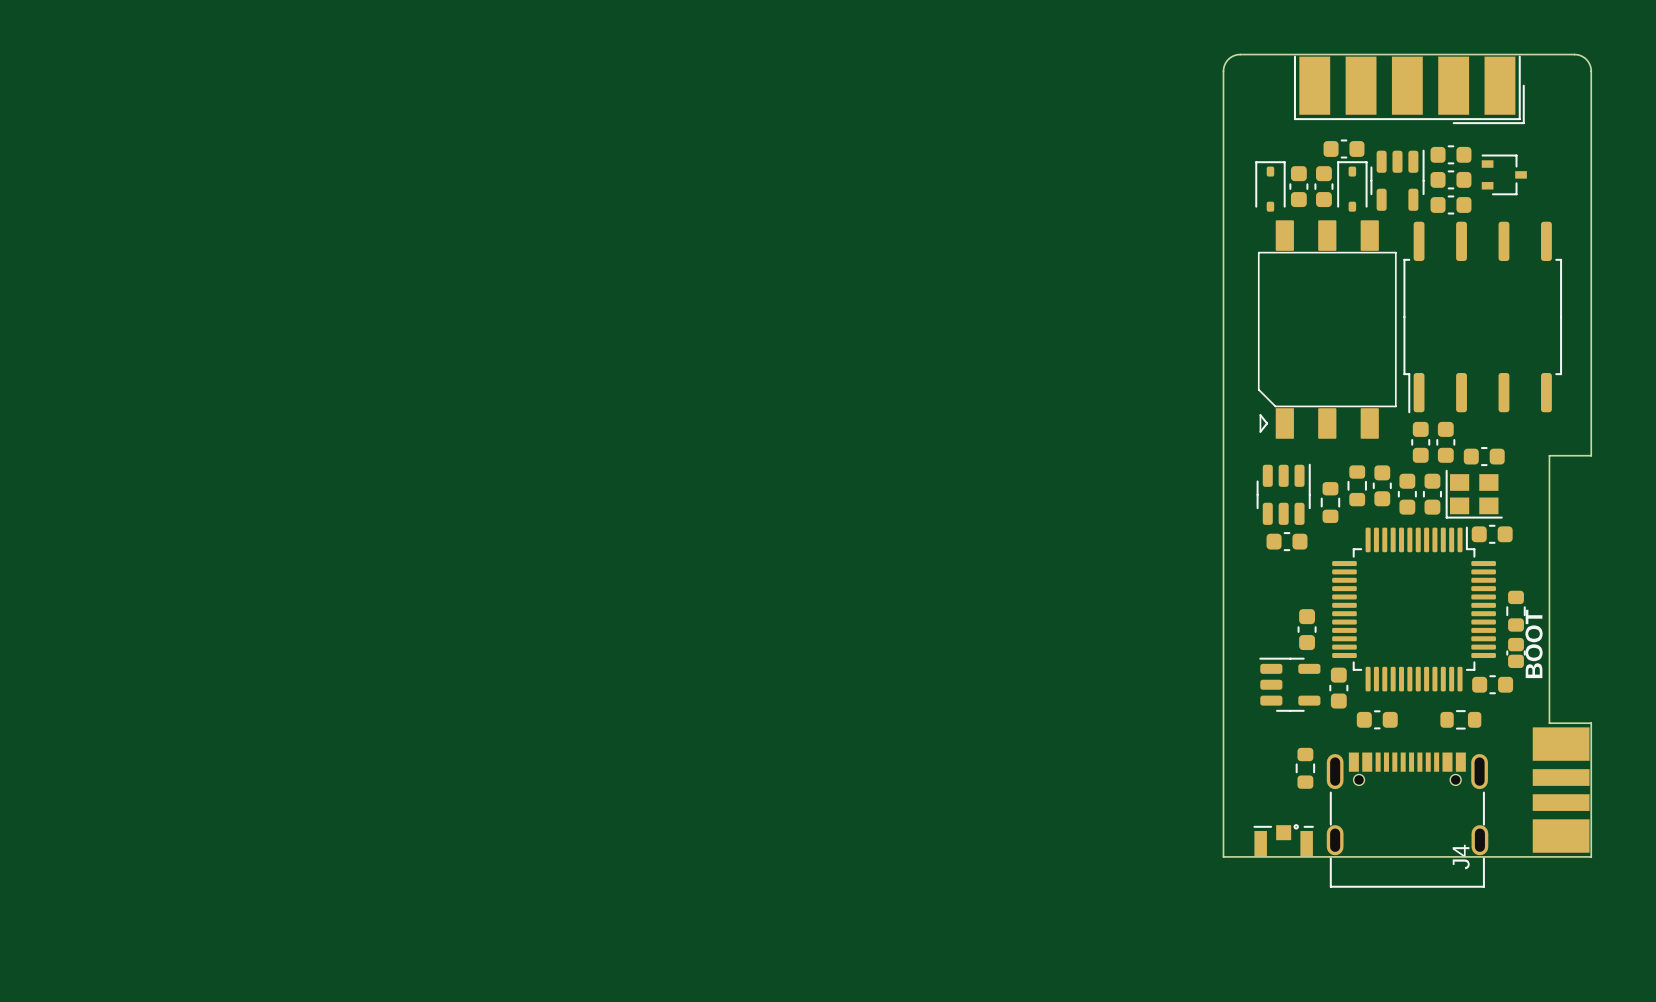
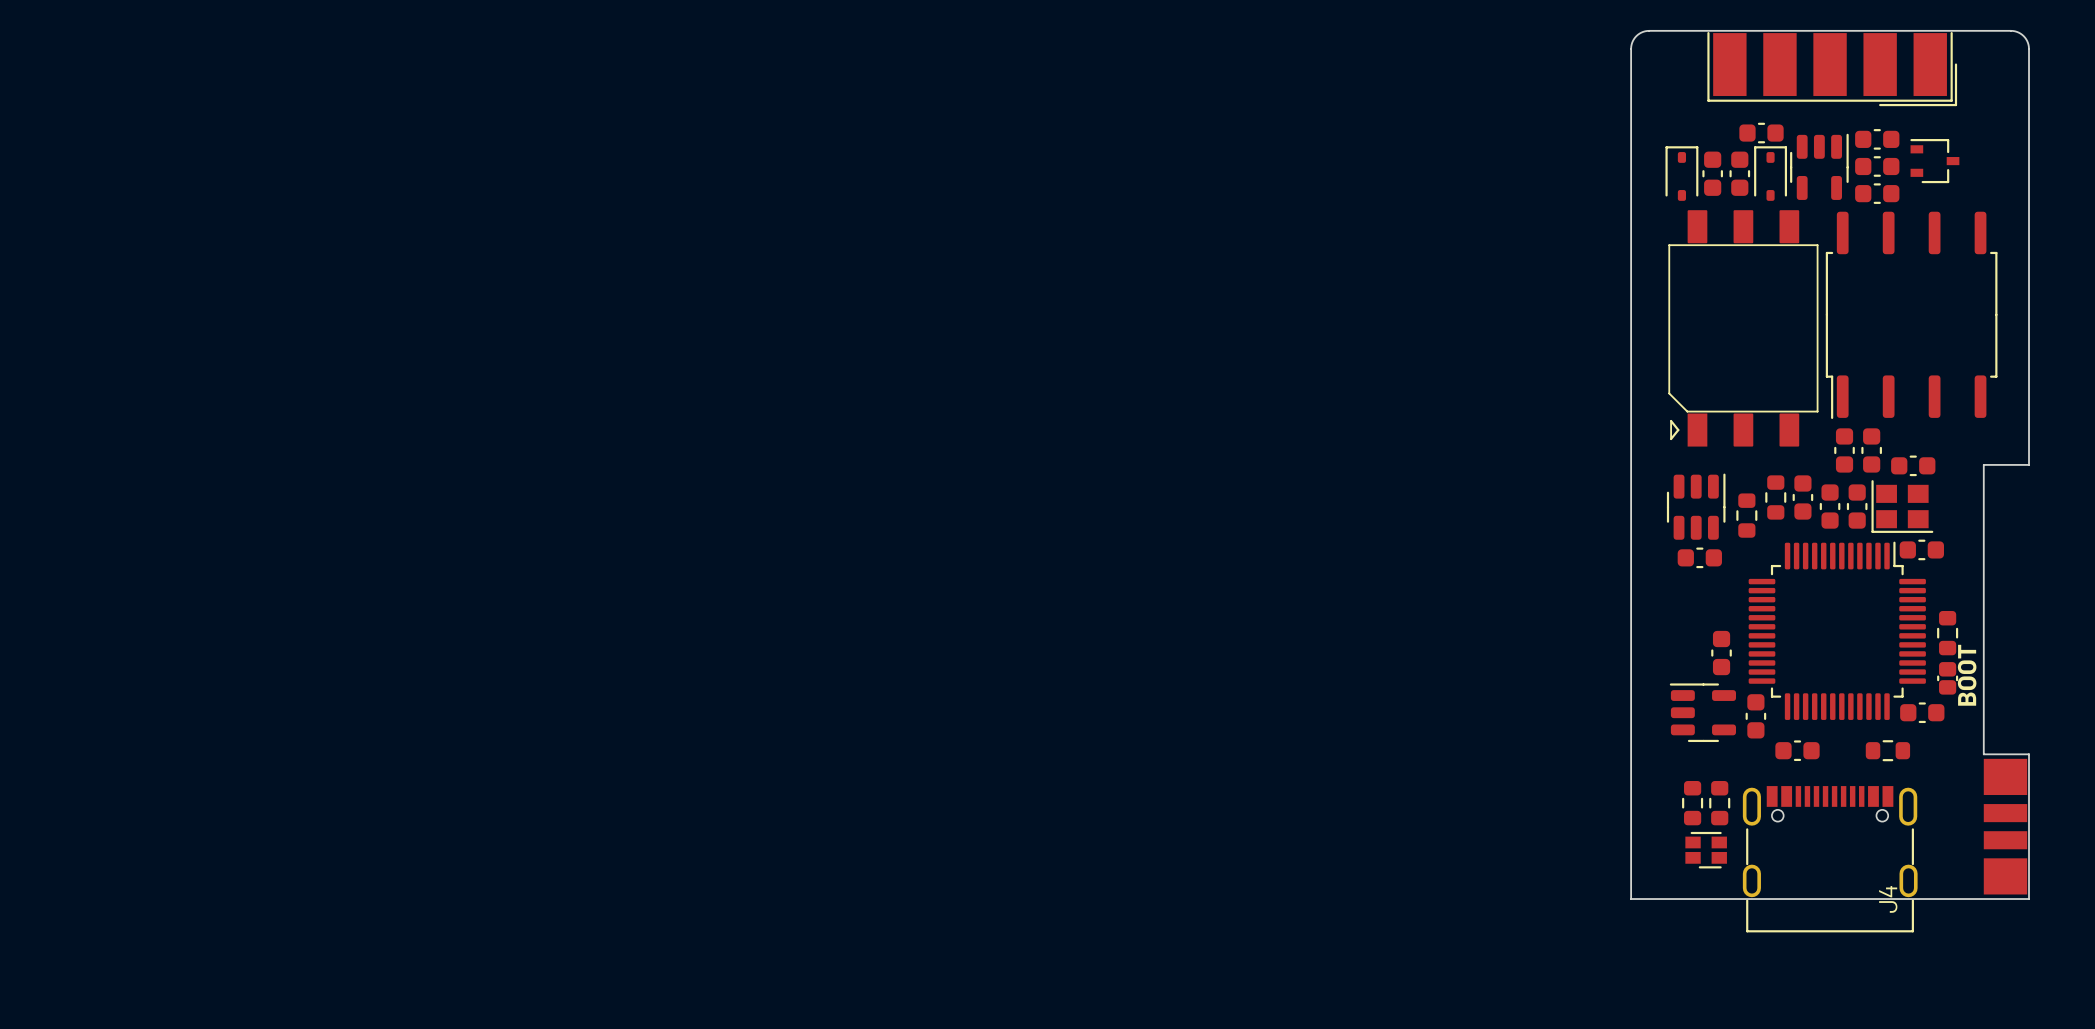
J4 footprint: [1532, 727, 1590, 853] -> [1983, 758, 2028, 895]
part: none -> (1692, 803)
part: none -> (1706, 850)
part: (1283, 840) -> none

